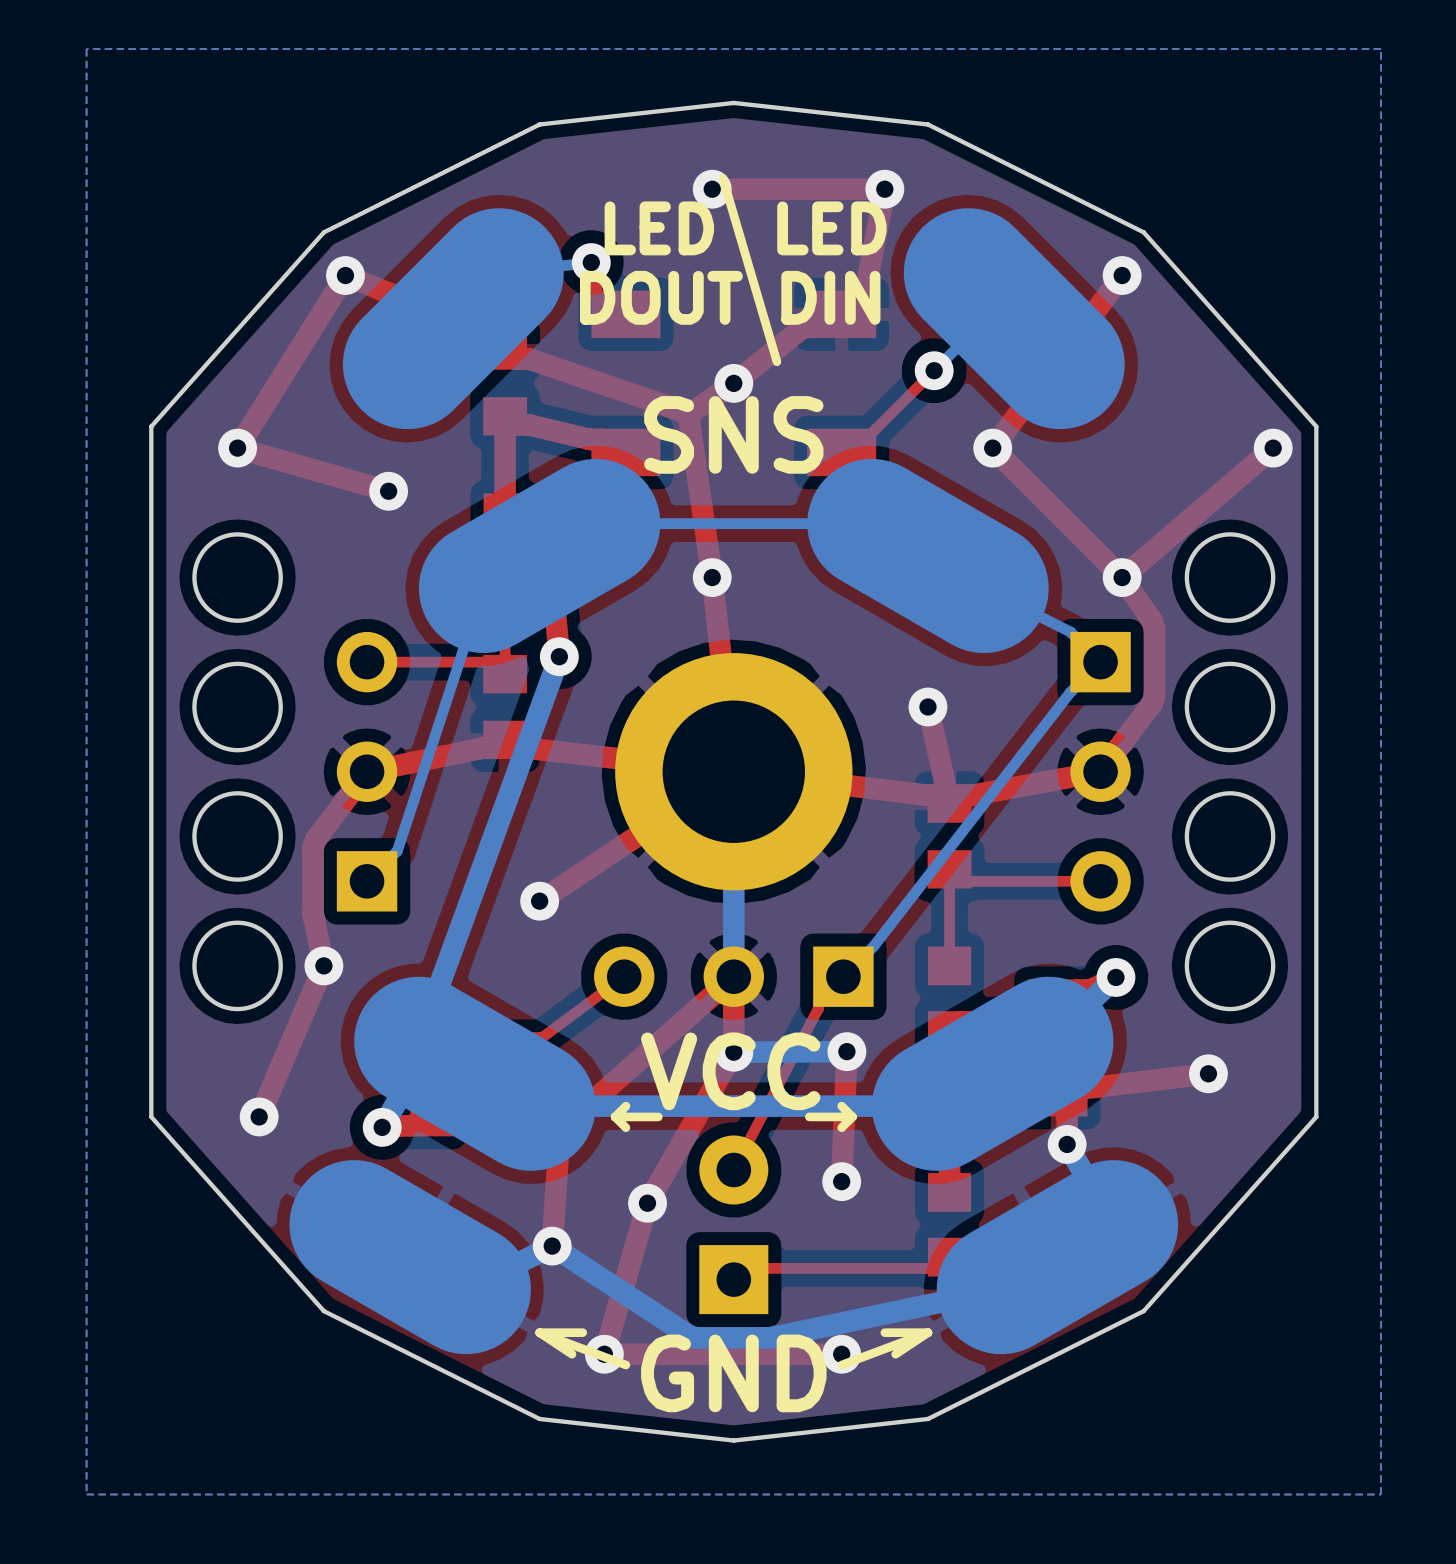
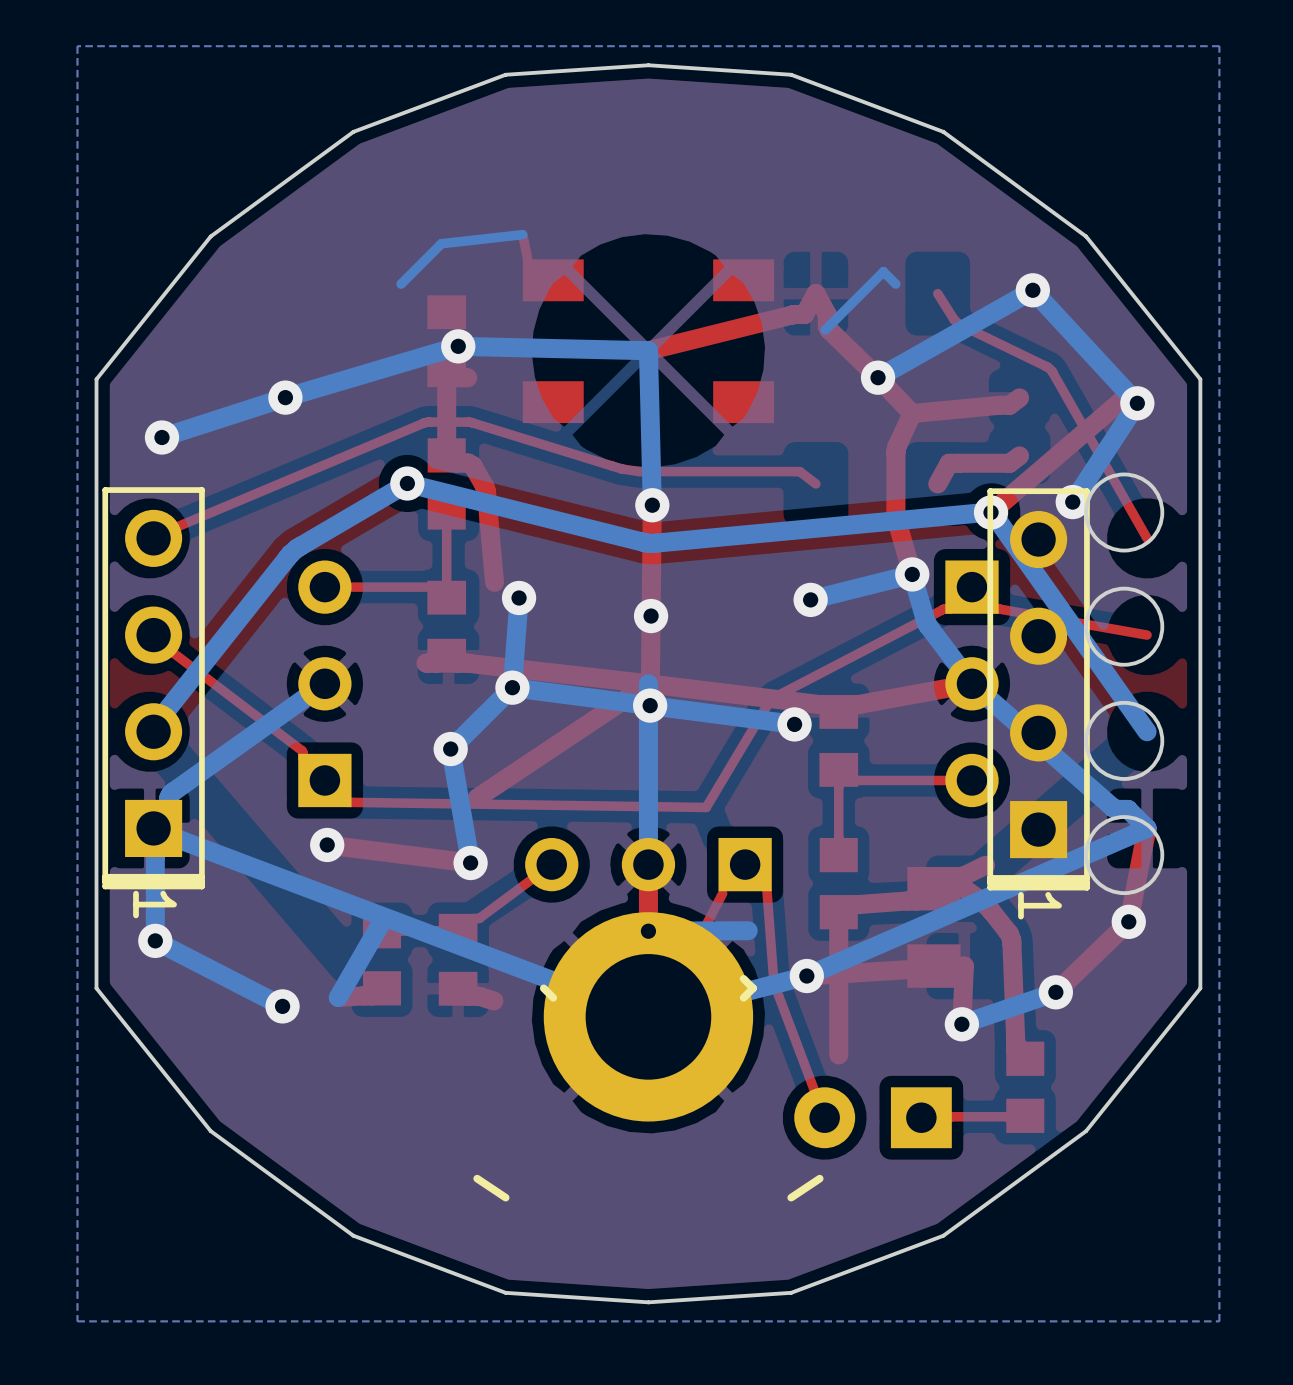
board edge: (733, 102) (539, 124) (323, 232) (151, 426) (151, 1116) (323, 1311) (539, 1418) (733, 1440) (927, 1418) (1143, 1311) (1316, 1116) (1316, 426) (1143, 232) (927, 124) (733, 102) -> (648, 65) (791, 74) (943, 131) (1086, 236) (1200, 379) (1200, 988) (1086, 1131) (943, 1235) (791, 1292) (648, 1302) (505, 1292) (353, 1235) (210, 1131) (96, 988) (96, 379) (210, 236) (353, 131) (505, 74) (648, 65)
line: (723, 178) (776, 361) -> none
top track: (712, 189) (884, 189) (865, 290) (865, 301) (817, 327) (802, 328) (733, 383) (688, 414) -> none
via: (712, 189) -> none
via: (884, 189) -> none
text: LED (659, 228) -> none
text: LED (831, 228) -> none
via: (591, 262) -> none
via: (345, 275) -> none
top track: (1122, 275) (992, 448) (1122, 577) (1152, 621) (1154, 628) (1154, 696) (1152, 703) (1100, 771) (973, 795) -> (971, 683) (859, 704)
via position: (1122, 275) -> (1032, 290)
text: DOUT (661, 297) -> none
text: DIN (830, 297) -> none
part: (453, 318) -> none
part: (1014, 318) -> none
top track: none -> (937, 293) (958, 324) (1051, 370) (1147, 538)
top track: none -> (793, 314) (804, 314) (815, 293) (827, 314) (828, 329) (912, 413)
top track: none -> (792, 314) (648, 350)
top track: (934, 370) (870, 434) (841, 452) -> none
via: (934, 370) -> none
via: (733, 383) -> none
via: none -> (458, 346)
top track: (688, 414) (712, 577) (733, 771) -> none
top track: (688, 414) (529, 359) (516, 358) (483, 331) (345, 275) (237, 448) (388, 491) -> none
top track: (529, 424) (588, 439) -> none
bottom track: none -> (878, 377) (1032, 290) (1137, 403) (1072, 502)
text: SNS (733, 434) -> none
via: none -> (285, 397)
top track: none -> (1019, 397) (1009, 405) (1000, 405)
via: (237, 448) -> none
via position: (992, 448) -> (878, 377)
via position: (1273, 448) -> (1137, 403)
top track: none -> (999, 405) (912, 413)
top track: none -> (912, 413) (895, 451) (895, 515) (912, 574)
via: (388, 491) -> none
bottom track: none -> (161, 437) (285, 397) (458, 346) (648, 350) (652, 505)
via: none -> (161, 437)
top track: none -> (1019, 455) (1009, 463) (949, 463) (937, 483)
round board edge: [192, 532, 283, 623] -> none
via: none -> (407, 483)
top track: none -> (815, 483) (799, 471) (639, 471) (621, 468) (471, 422) (427, 422) (149, 538)
part: (539, 555) -> none
part: (927, 555) -> none
via: none -> (1072, 502)
top track: none -> (652, 505) (650, 705)
via position: (712, 577) -> (652, 505)
round board edge position: (1230, 577) -> (1124, 512)
via: none -> (912, 574)
bottom track: (559, 656) (418, 1041) (530, 1106) (936, 1106) (1048, 1041) (1115, 977) -> none
via position: (559, 656) -> (519, 598)
round board edge: [192, 661, 283, 753] -> none
bottom track: none -> (519, 598) (512, 687)
bottom track: none -> (810, 599) (912, 574) (927, 624) (971, 683) (1113, 808) (1128, 809) (1147, 828) (806, 976) (648, 1016) (149, 828)
top track: none -> (943, 609) (775, 696) (768, 703) (706, 807) (346, 802) (303, 758) (302, 750) (149, 635)
top track: none -> (999, 609) (1147, 635)
via: none -> (651, 616)
top track: (927, 707) (949, 803) (938, 795) (927, 795) -> none
via position: (927, 707) -> (810, 599)
round board edge position: (1230, 707) -> (1124, 626)
top track: (481, 748) (367, 771) (315, 839) (313, 847) (313, 912) (323, 965) (259, 1116) -> none
bottom track: none -> (324, 683) (170, 793) (168, 797) (168, 809) (149, 828)
part position: (733, 771) -> (648, 1016)
part: none -> (153, 688)
bottom track: none -> (512, 687) (450, 749) (470, 863)
bottom track: none -> (512, 687) (794, 724)
via: none -> (512, 687)
part: none -> (1038, 689)
round board edge: [192, 791, 283, 882] -> none
via: none -> (650, 705)
via: none -> (794, 724)
bottom track: none -> (1147, 731) (991, 511) (652, 543) (407, 483) (296, 548) (290, 554) (149, 731)
round board edge position: (1230, 836) -> (1124, 740)
via: none -> (450, 749)
bottom track: (367, 881) (397, 851) (483, 588) (595, 523) (871, 523) (984, 588) (1070, 631) (1100, 662) (1070, 692) (873, 946) (843, 976) -> none
via: (539, 901) -> none
round board edge: [192, 920, 283, 1012] -> none
bottom track: none -> (149, 828) (155, 847) (155, 940) (282, 1006)
top track: none -> (1147, 828) (1128, 921) (1055, 992)
top track: none -> (327, 844) (470, 863)
via position: (323, 965) -> (327, 844)
round board edge position: (1230, 965) -> (1124, 855)
via: none -> (470, 863)
top track: (733, 976) (558, 1131) (552, 1246) -> none
via: (1115, 977) -> none
top track: none -> (964, 888) (990, 910) (1009, 933) (1011, 940) (1015, 1041)
top track: none -> (767, 891) (774, 985) (824, 1117)
via: none -> (1128, 921)
top track: (846, 1051) (841, 1181) -> none
via: (846, 1051) -> none
top track: (733, 1052) (647, 1203) (604, 1354) (841, 1354) -> none
via: none -> (155, 940)
text: VCC (730, 1071) -> none
part: (474, 1073) -> none
part: (992, 1073) -> none
top track: (1208, 1073) (1057, 1091) (1067, 1105) (1067, 1144) -> none
via: (1208, 1073) -> none
top track: none -> (806, 976) (964, 966) (961, 1024)
via: none -> (806, 976)
line: (625, 1106) (615, 1116) (658, 1116) -> none
via: (259, 1116) -> none
line: (852, 1116) (809, 1116) -> none
bottom track: none -> (1055, 992) (961, 1024)
via: none -> (1055, 992)
via: (382, 1127) -> none
via: none -> (282, 1006)
bottom track: (1067, 1144) (1113, 1224) (1001, 1289) (771, 1337) (695, 1337) (689, 1335) (552, 1246) (466, 1289) (410, 1257) -> none
via position: (1067, 1144) -> (961, 1024)
via: (841, 1181) -> none
via: (647, 1203) -> none
part rotation: 0° (733, 1224) -> 90° counterclockwise (873, 1117)
part position: (733, 1224) -> (873, 1117)
part position: (949, 1224) -> (1025, 1087)
via: (552, 1246) -> none
part: (410, 1257) -> none
top track: (949, 1257) (933, 1268) (762, 1268) (733, 1279) -> none
part: (1057, 1257) -> none
top track: none -> (1025, 1115) (921, 1117)
line: (582, 1332) (539, 1332) (625, 1365) -> none
line: (884, 1332) (927, 1332) (841, 1365) -> none
via: (604, 1354) -> none
via: (841, 1354) -> none
text: GND (733, 1373) -> none

